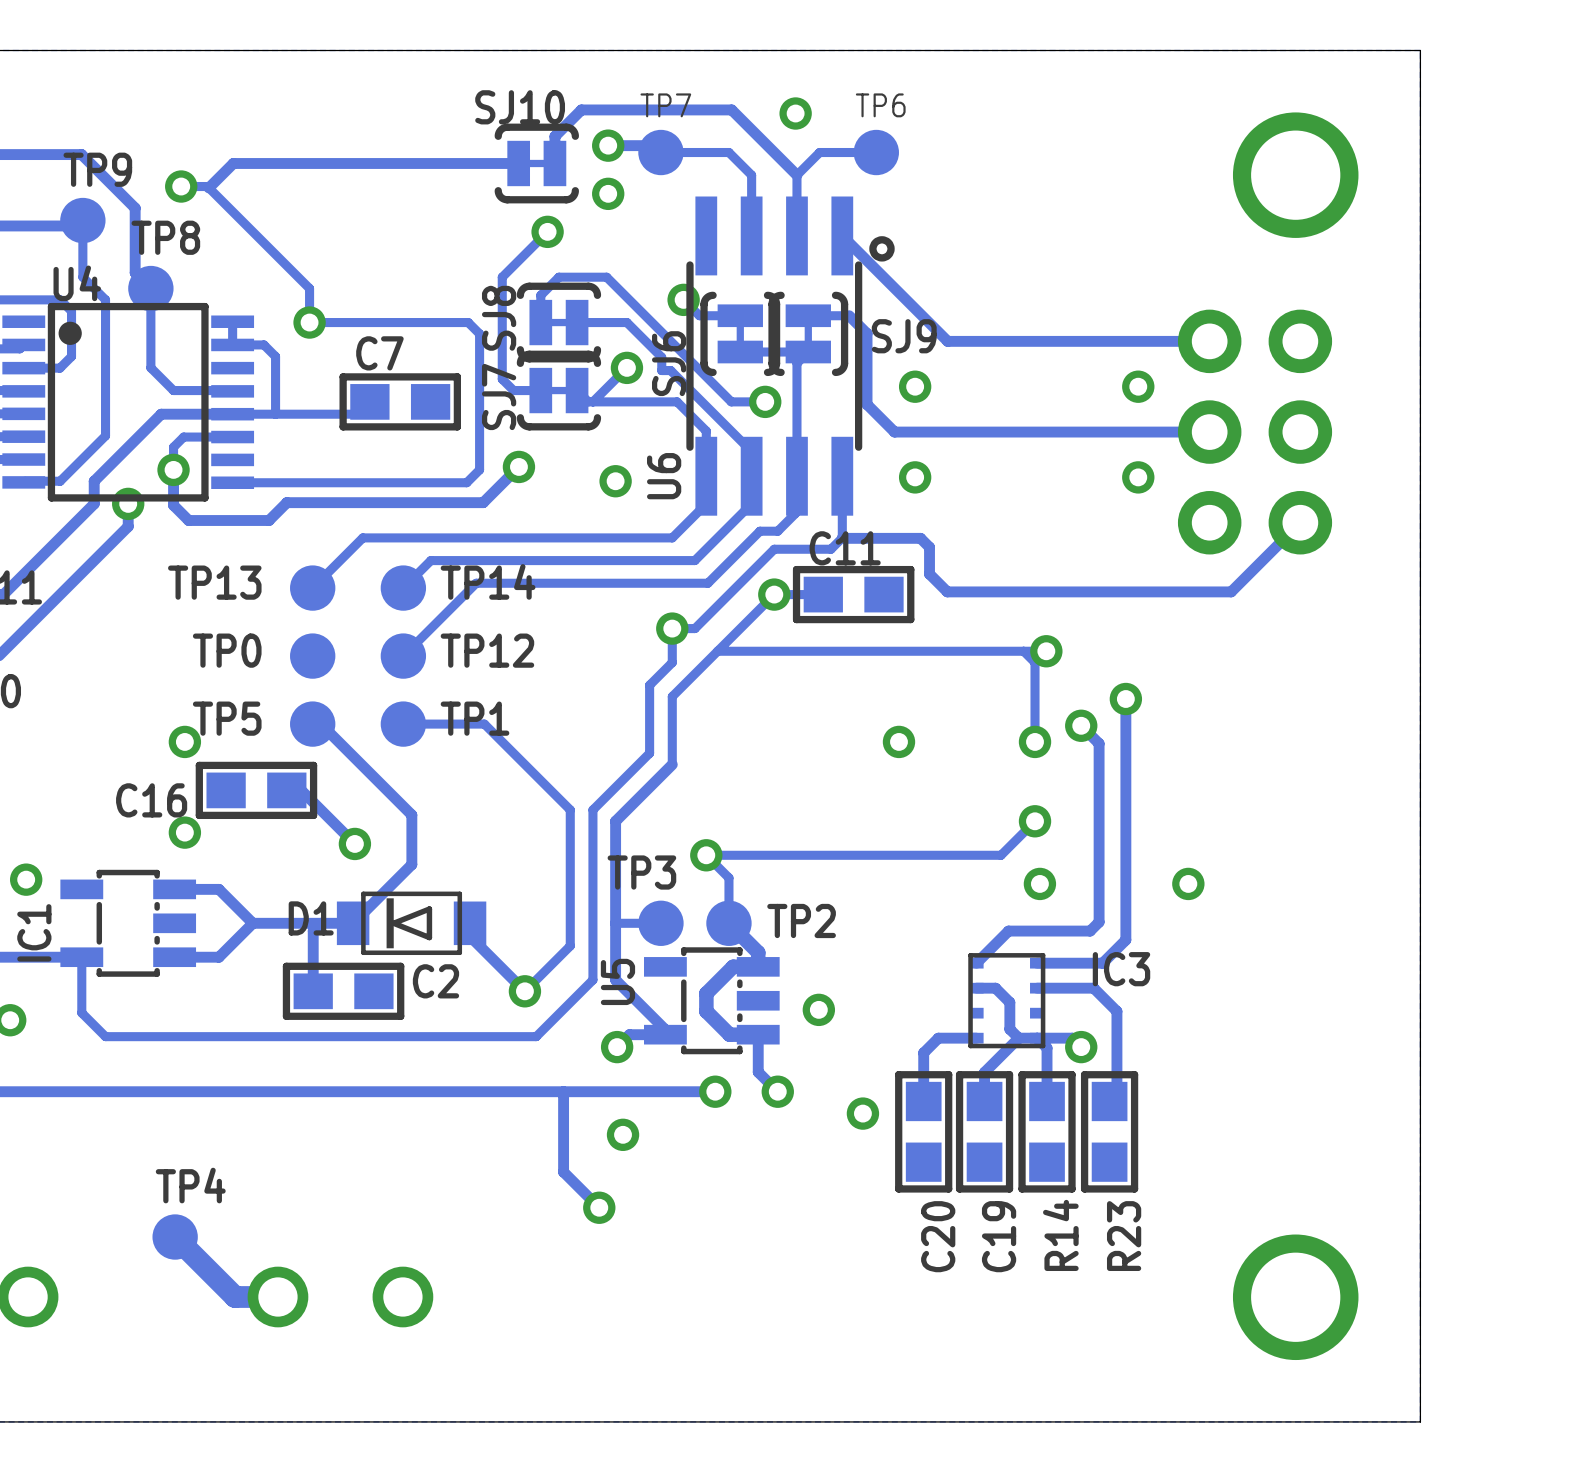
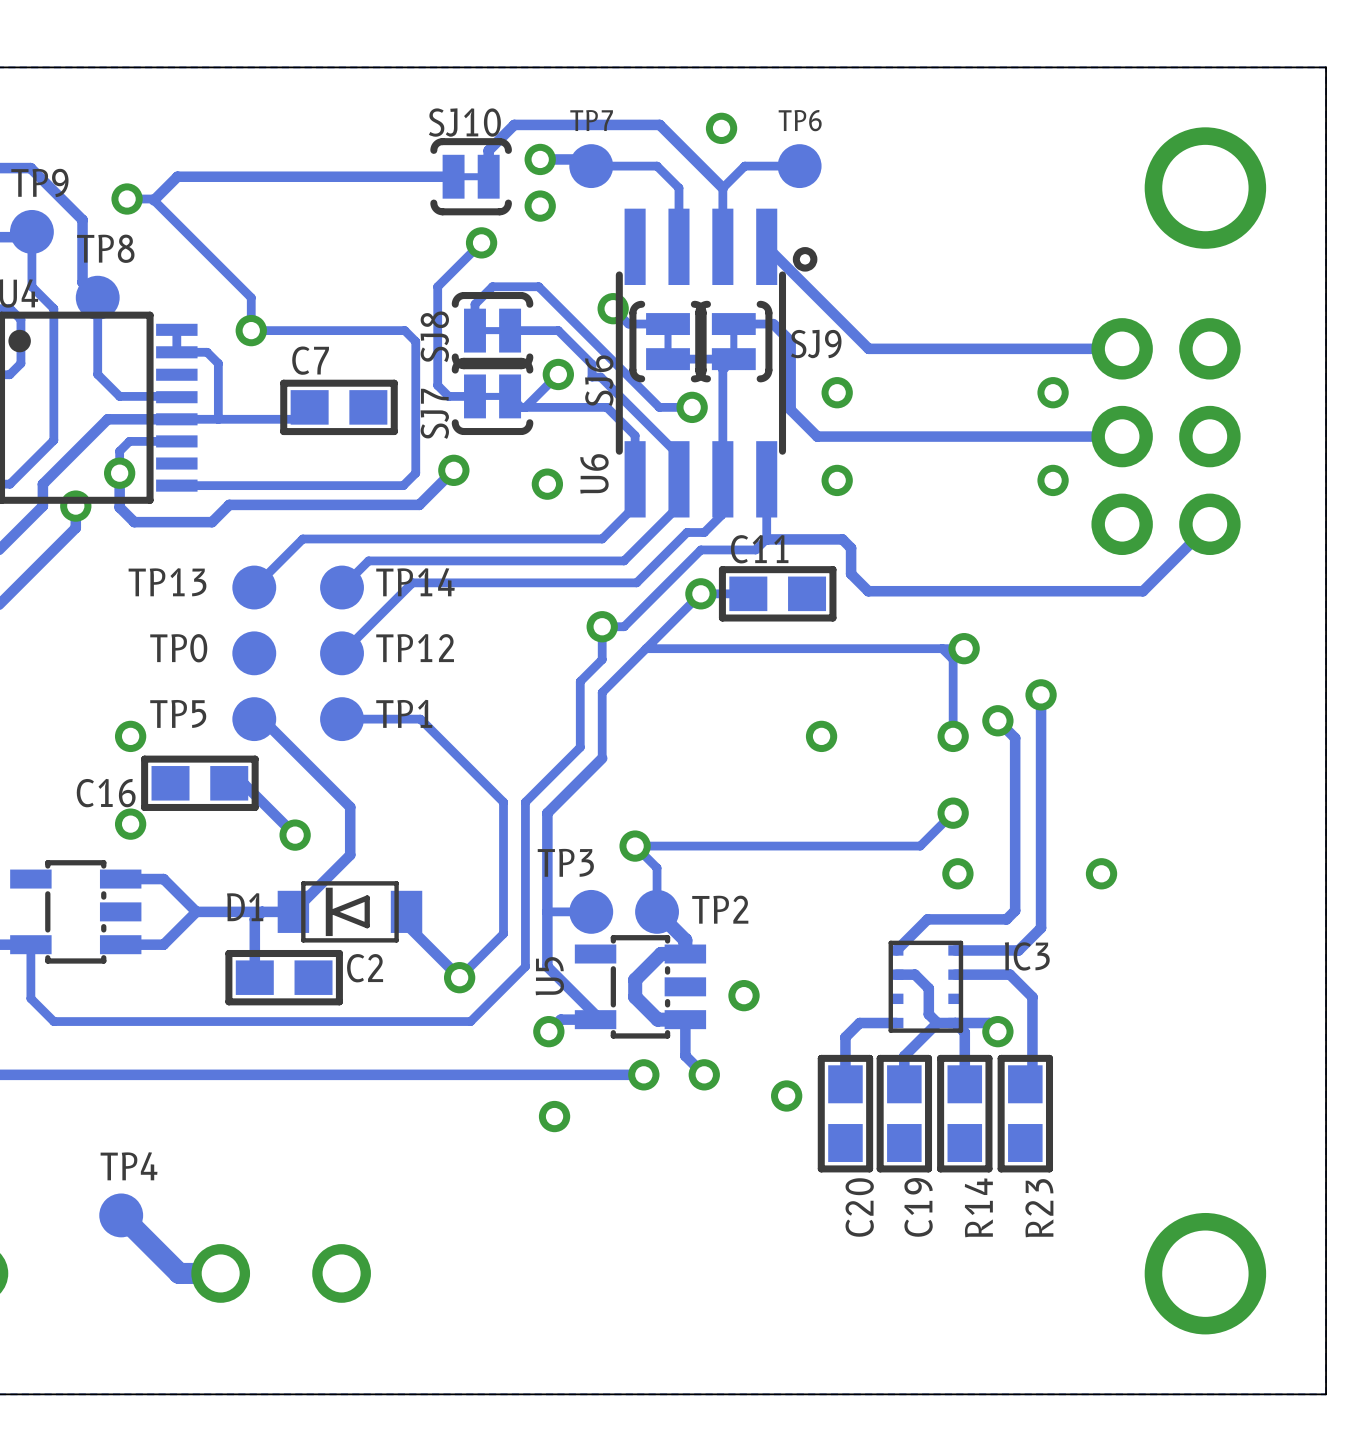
track: (563, 1091) (563, 1172) (599, 1207) -> none
via: (599, 1207) -> none

